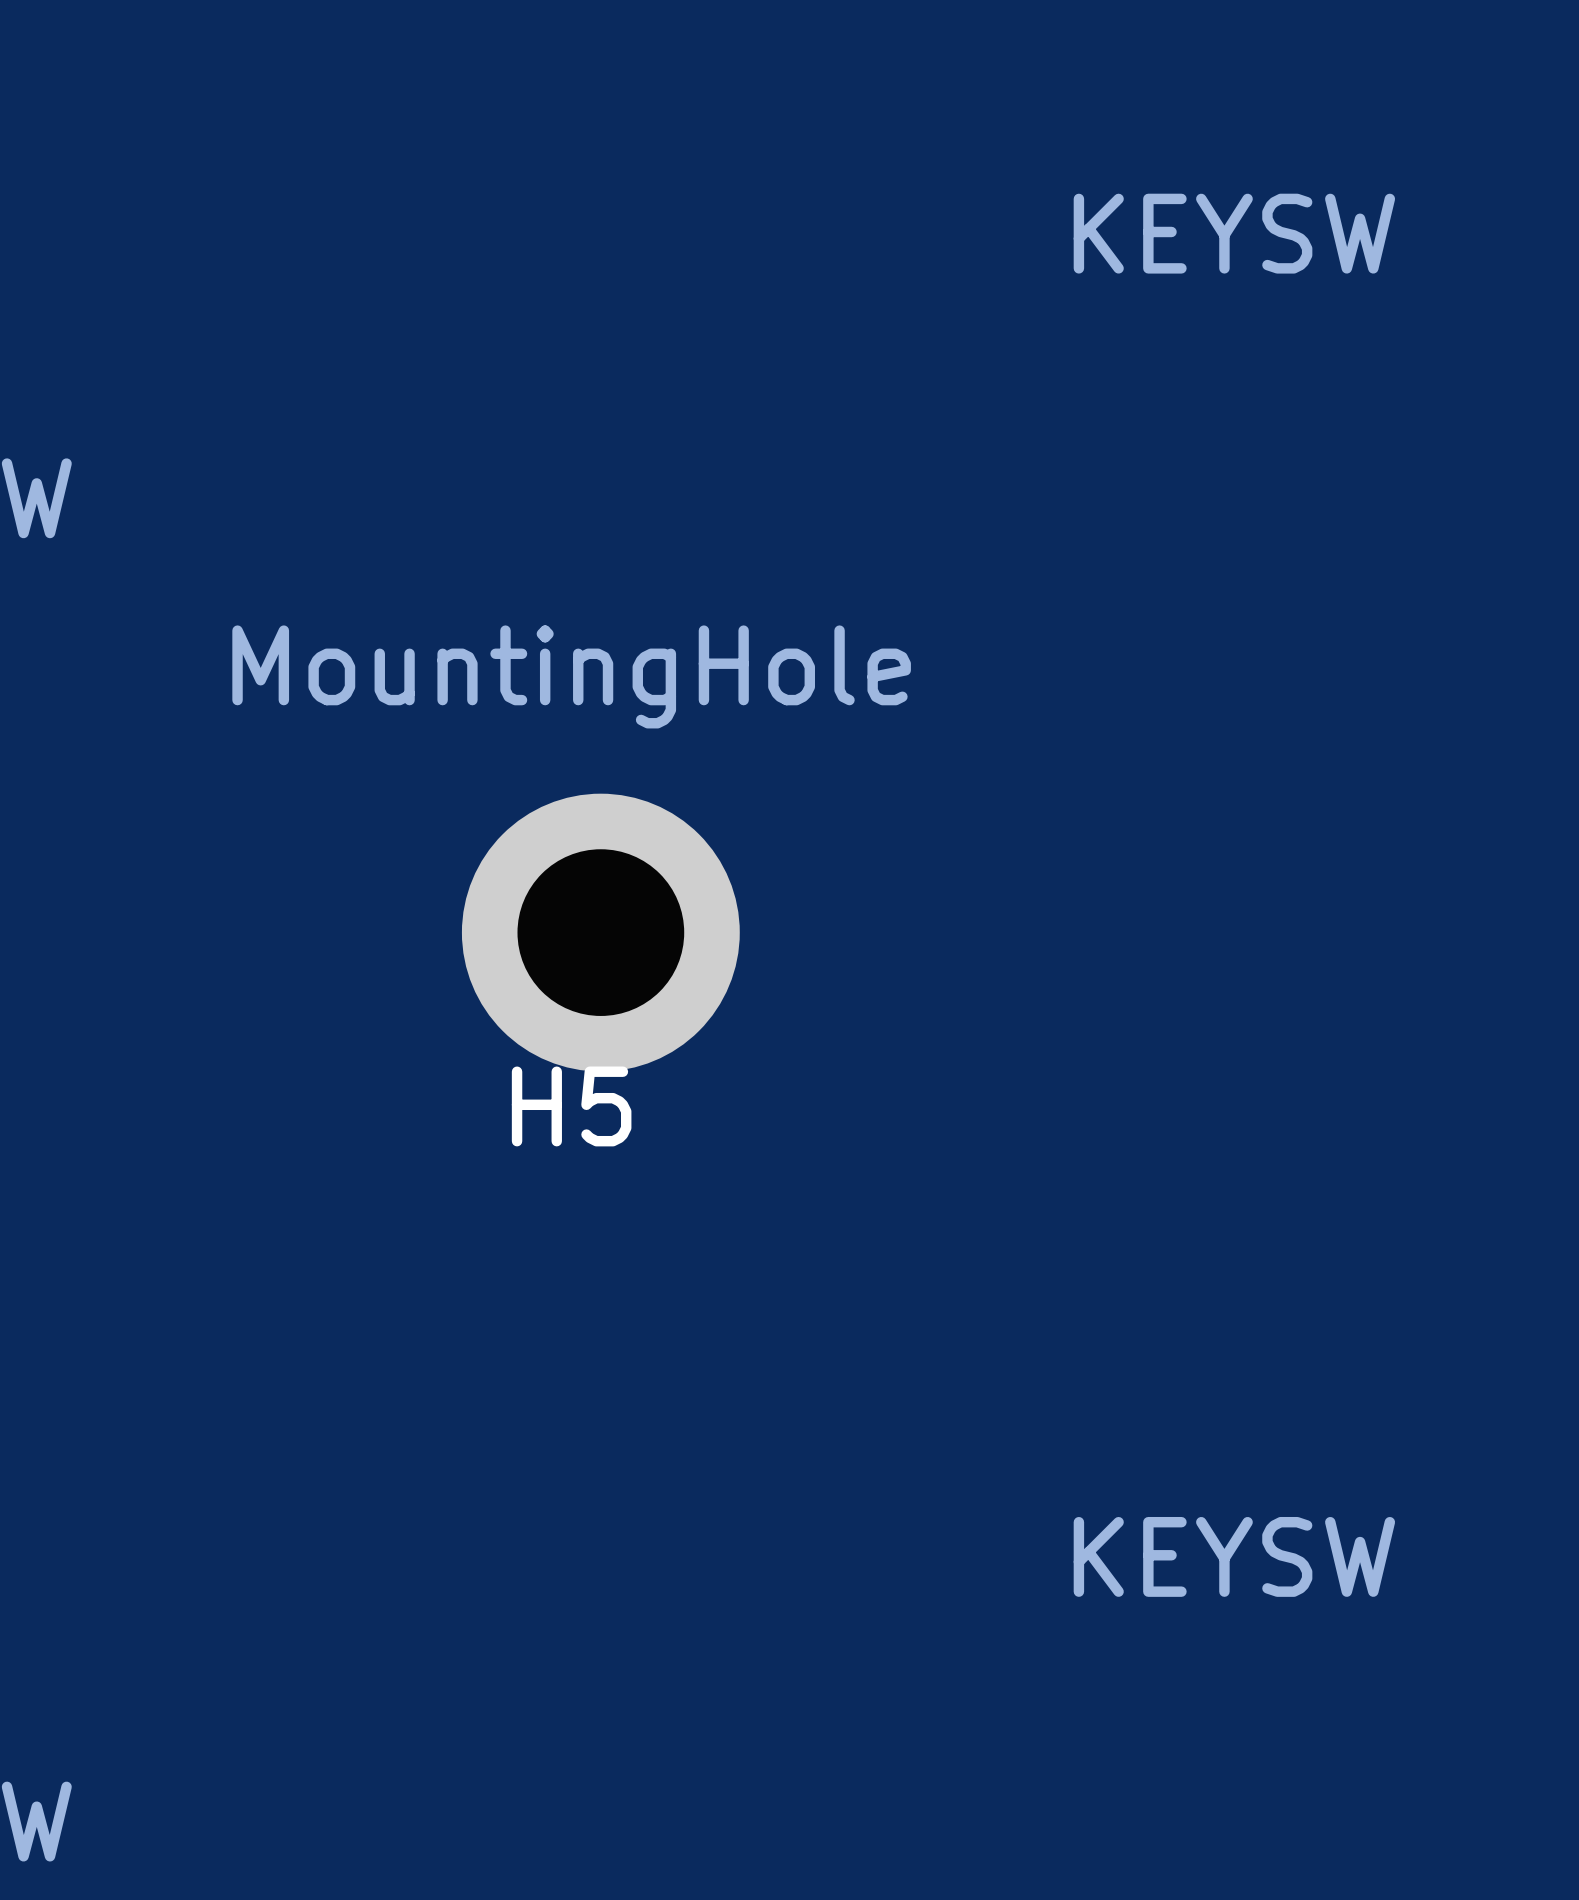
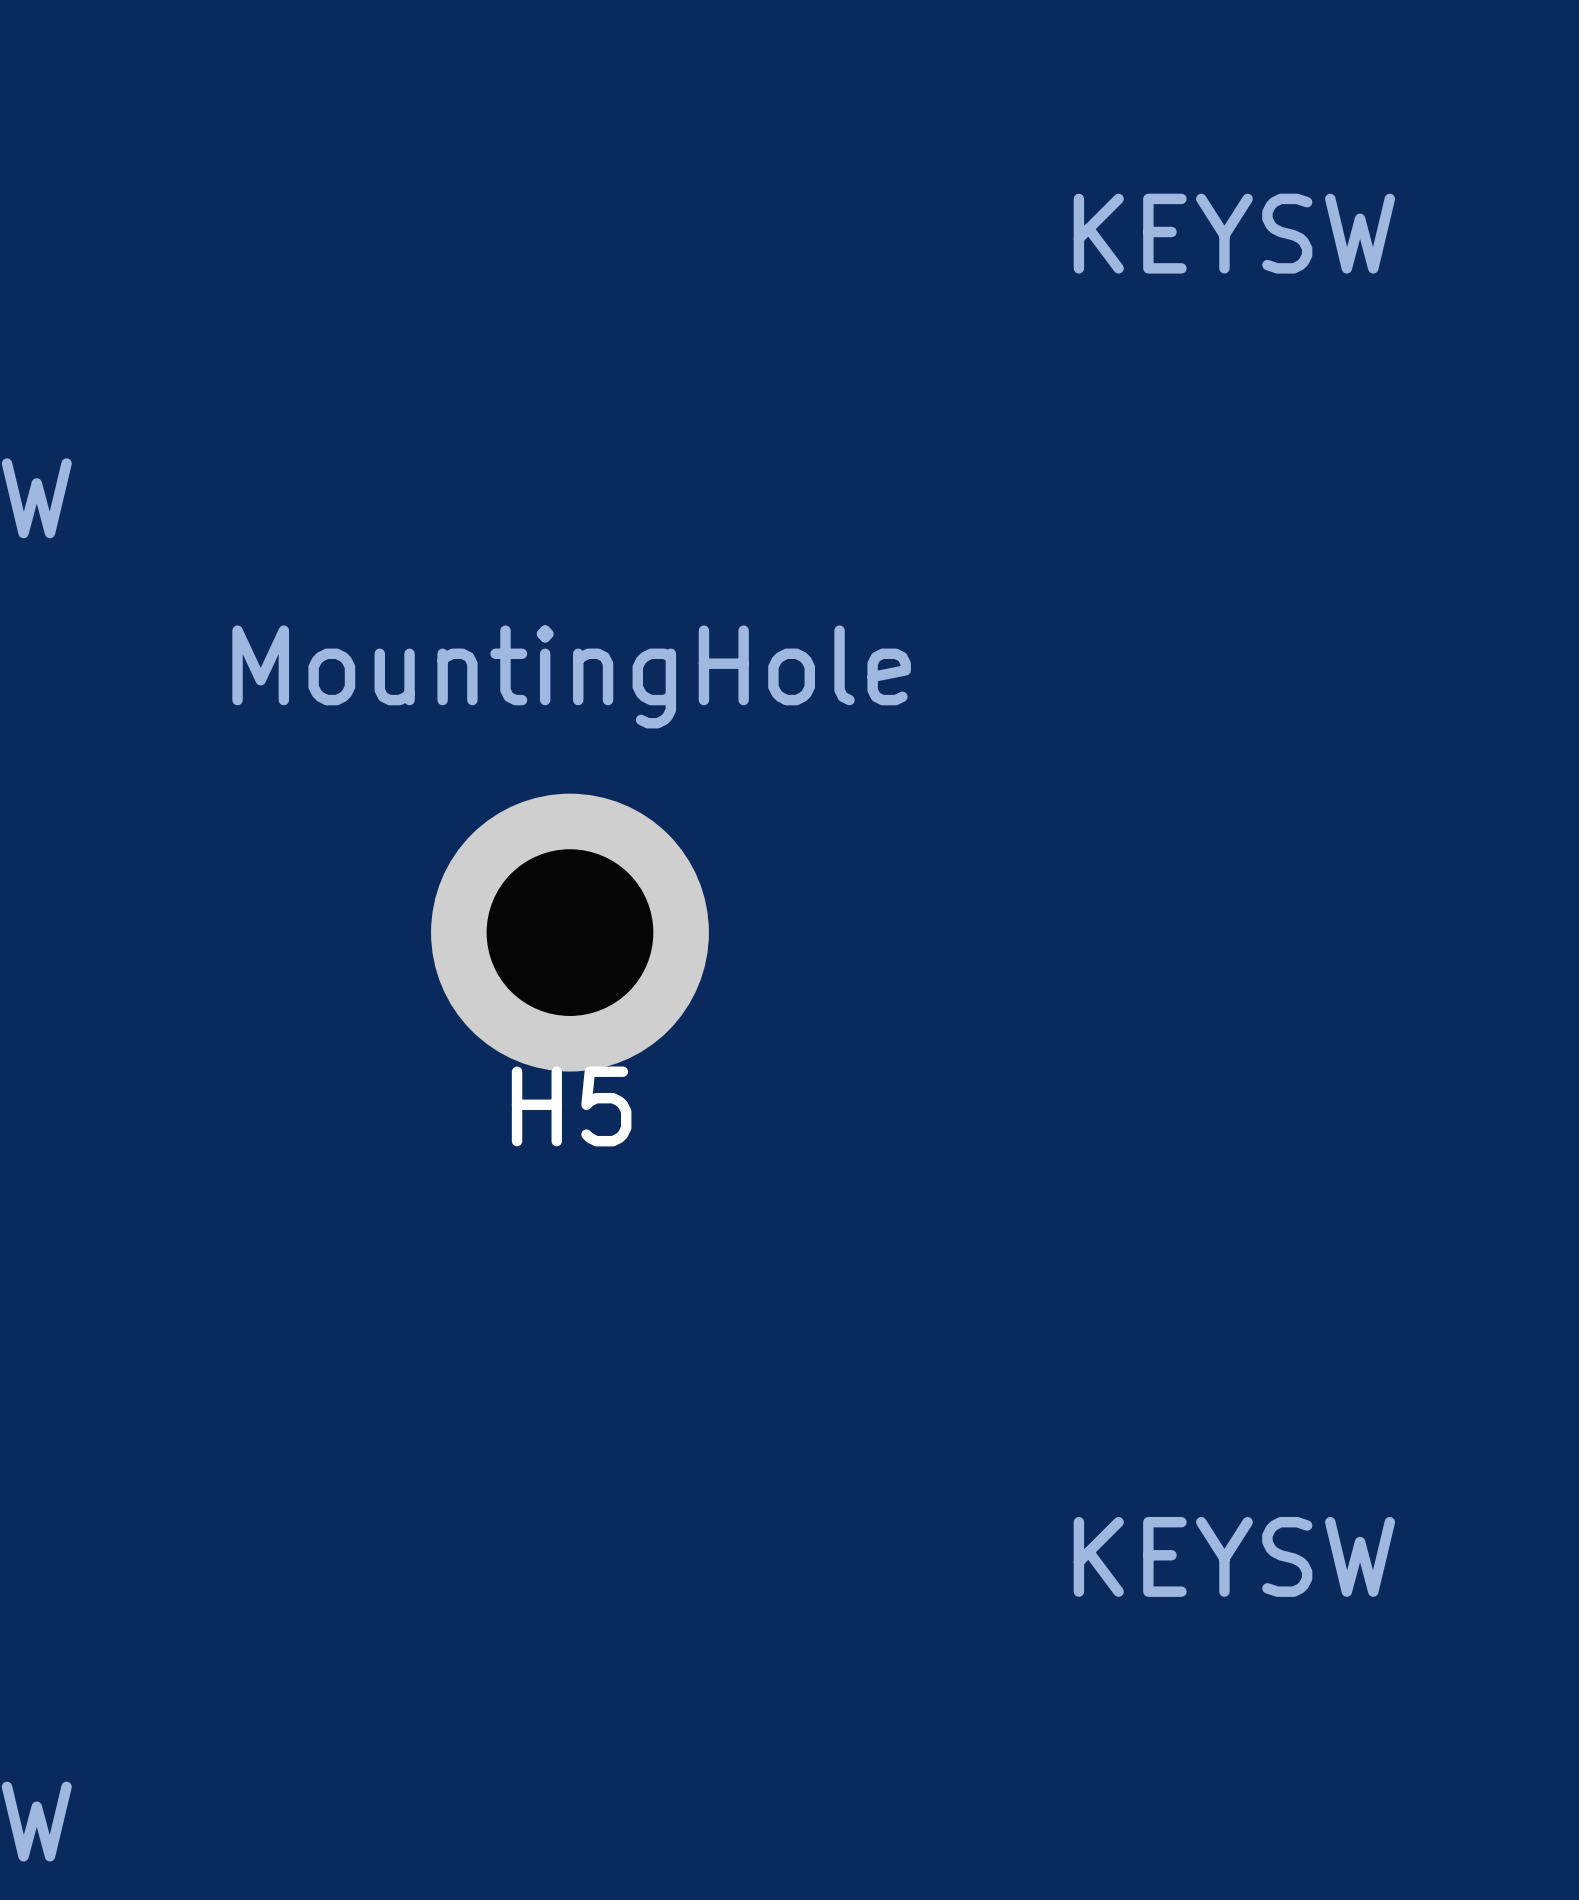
H5 position: (600, 932) -> (569, 932)

